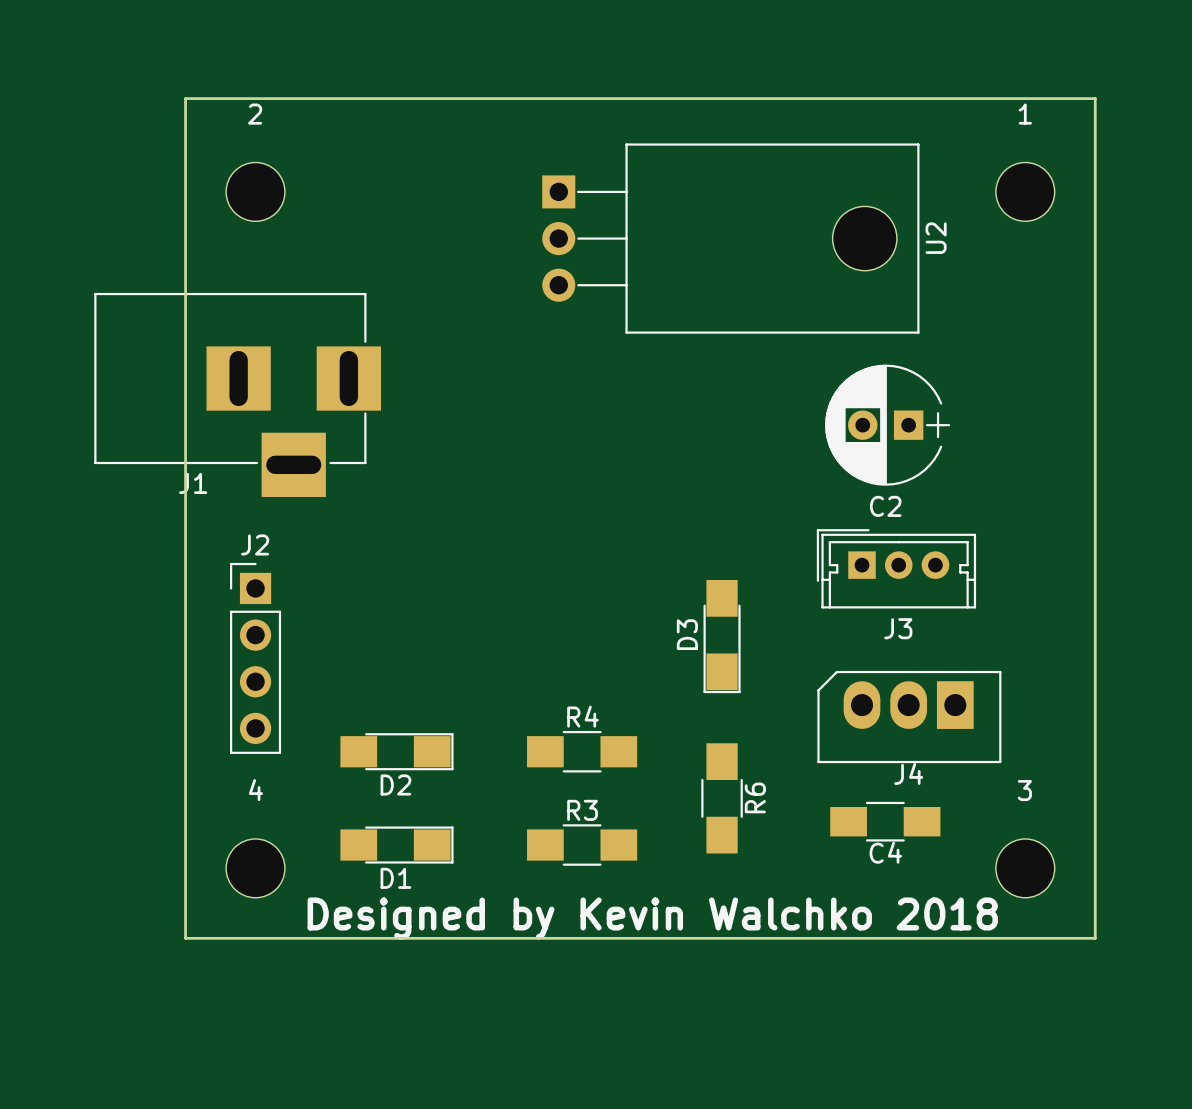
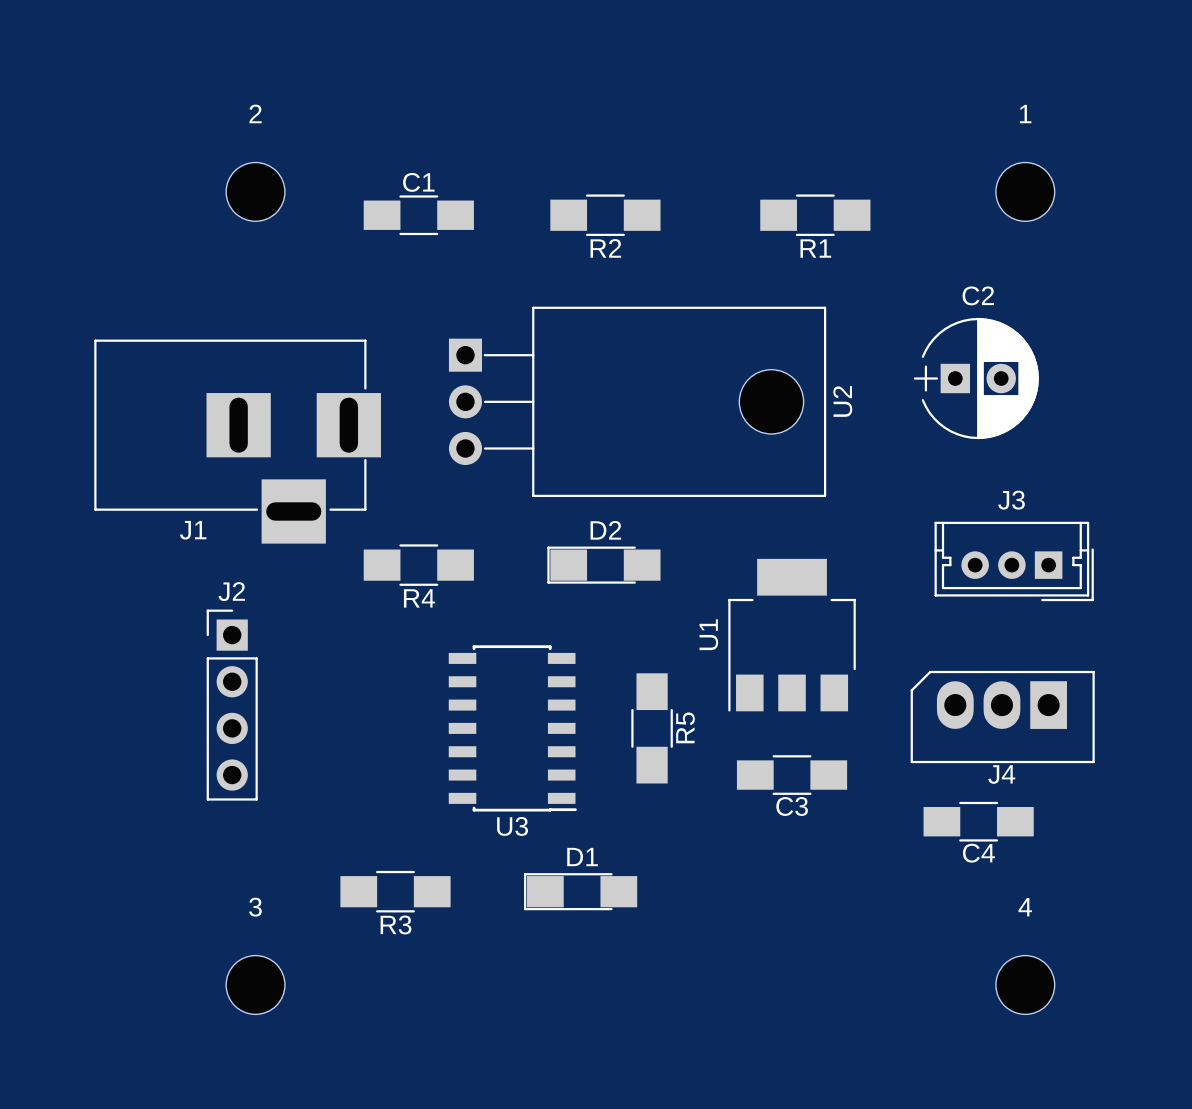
board edge: (185, 98) (185, 938) (1095, 938) (1095, 98) (185, 98) -> none
C1: none -> (418, 215)
R2: none -> (605, 215)
R1: none -> (815, 215)
U2 position: (730, 238) -> (637, 401)
J1 position: (237, 394) -> (237, 441)
C2 rotation: 0° (887, 425) -> 180° (976, 378)
C2 position: (887, 425) -> (976, 378)
J3 rotation: 0° (896, 568) -> 180° (1014, 561)
J3 position: (896, 568) -> (1014, 561)
U1: none -> (792, 635)
D3: (722, 636) -> none
J2 position: (255, 658) -> (232, 705)
R4 name position: R4 (582, 716) -> R4 (419, 598)
J4 position: (909, 717) -> (1002, 717)
U3: none -> (512, 728)
R5: none -> (652, 728)
D2 rotation: 0° (396, 751) -> 180° (603, 565)
D2 position: (396, 751) -> (603, 565)
R4 position: (582, 751) -> (418, 565)
C3: none -> (792, 775)
R6: (722, 798) -> none
R3 name position: R3 (582, 810) -> R3 (396, 924)
C4 position: (885, 821) -> (978, 821)
D1 rotation: 0° (396, 845) -> 180° (580, 891)
D1 position: (396, 845) -> (580, 891)
R3 position: (582, 845) -> (395, 891)
4 position: (255, 868) -> (1025, 984)
3 position: (1025, 868) -> (255, 984)
text: Designed by Kevin Walchko 2018 (652, 918) -> none

